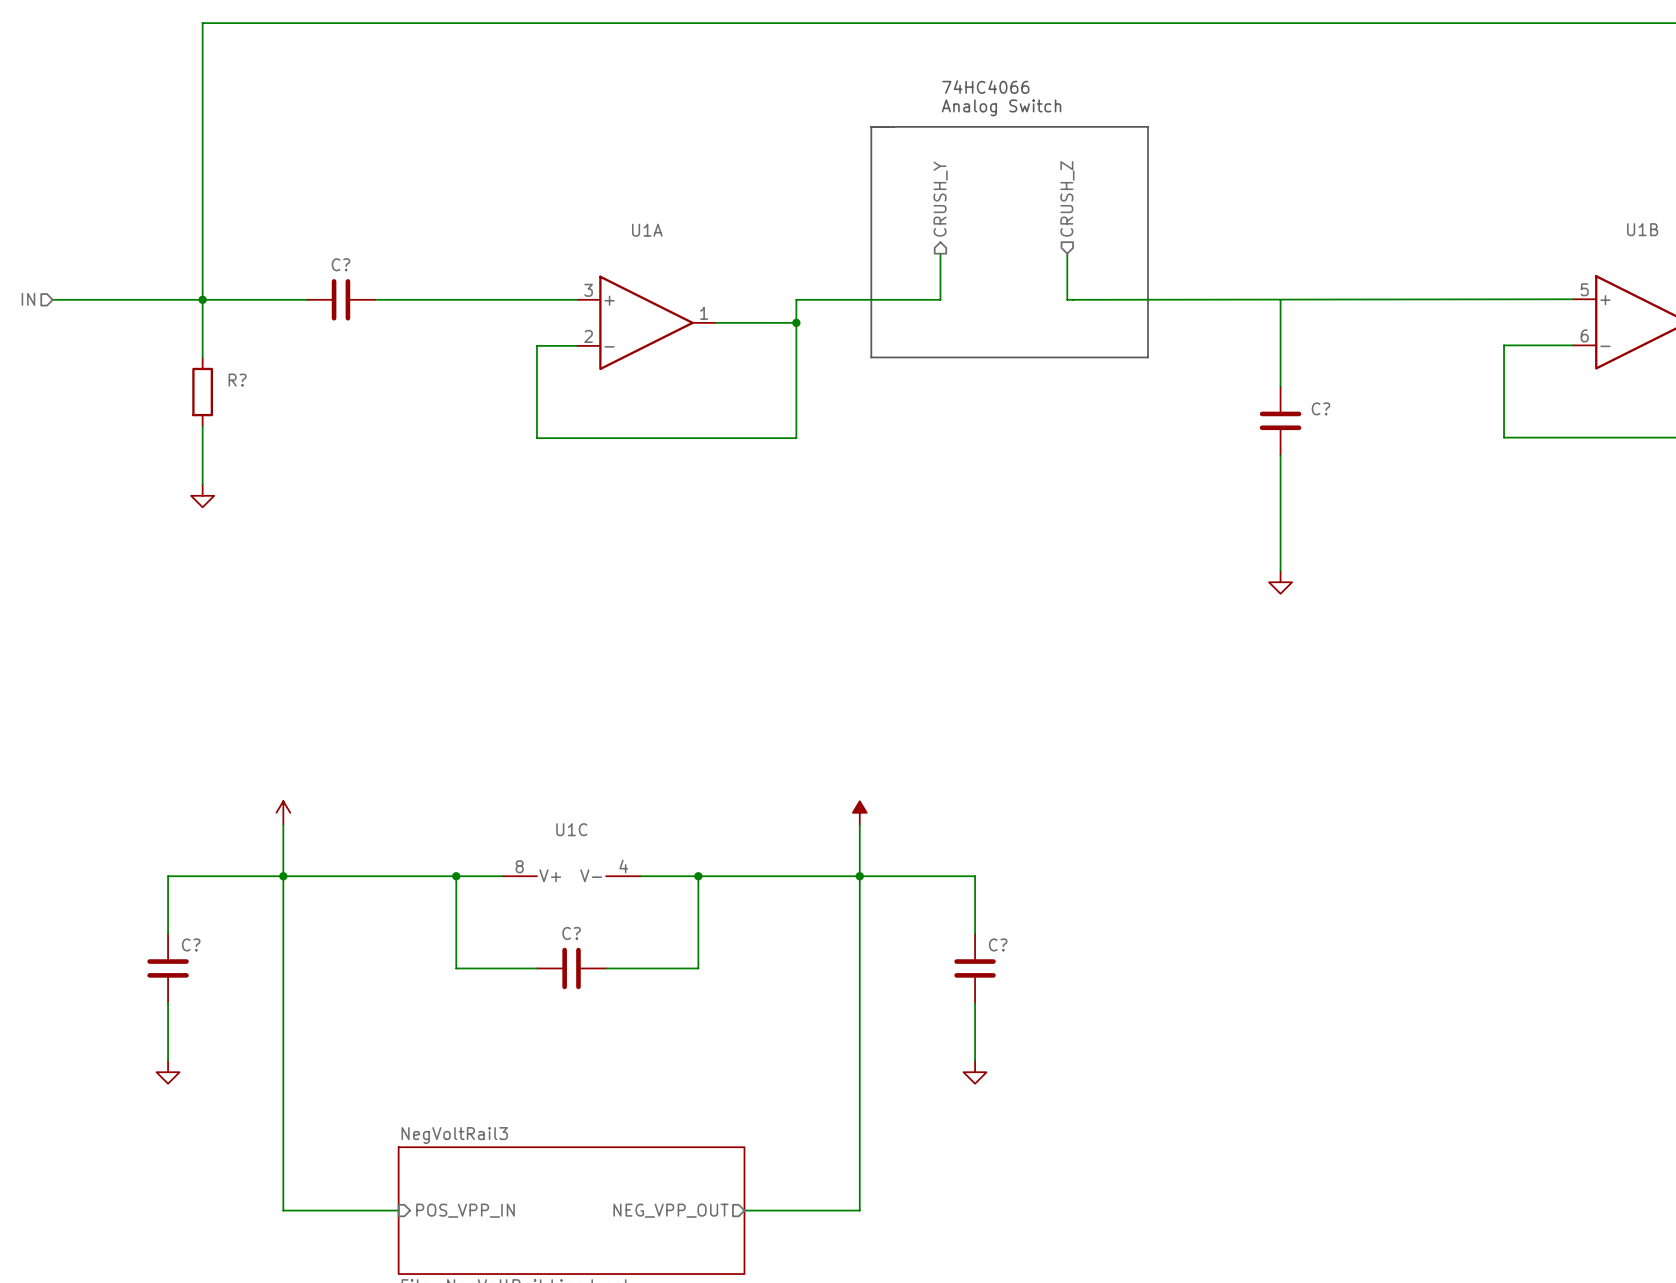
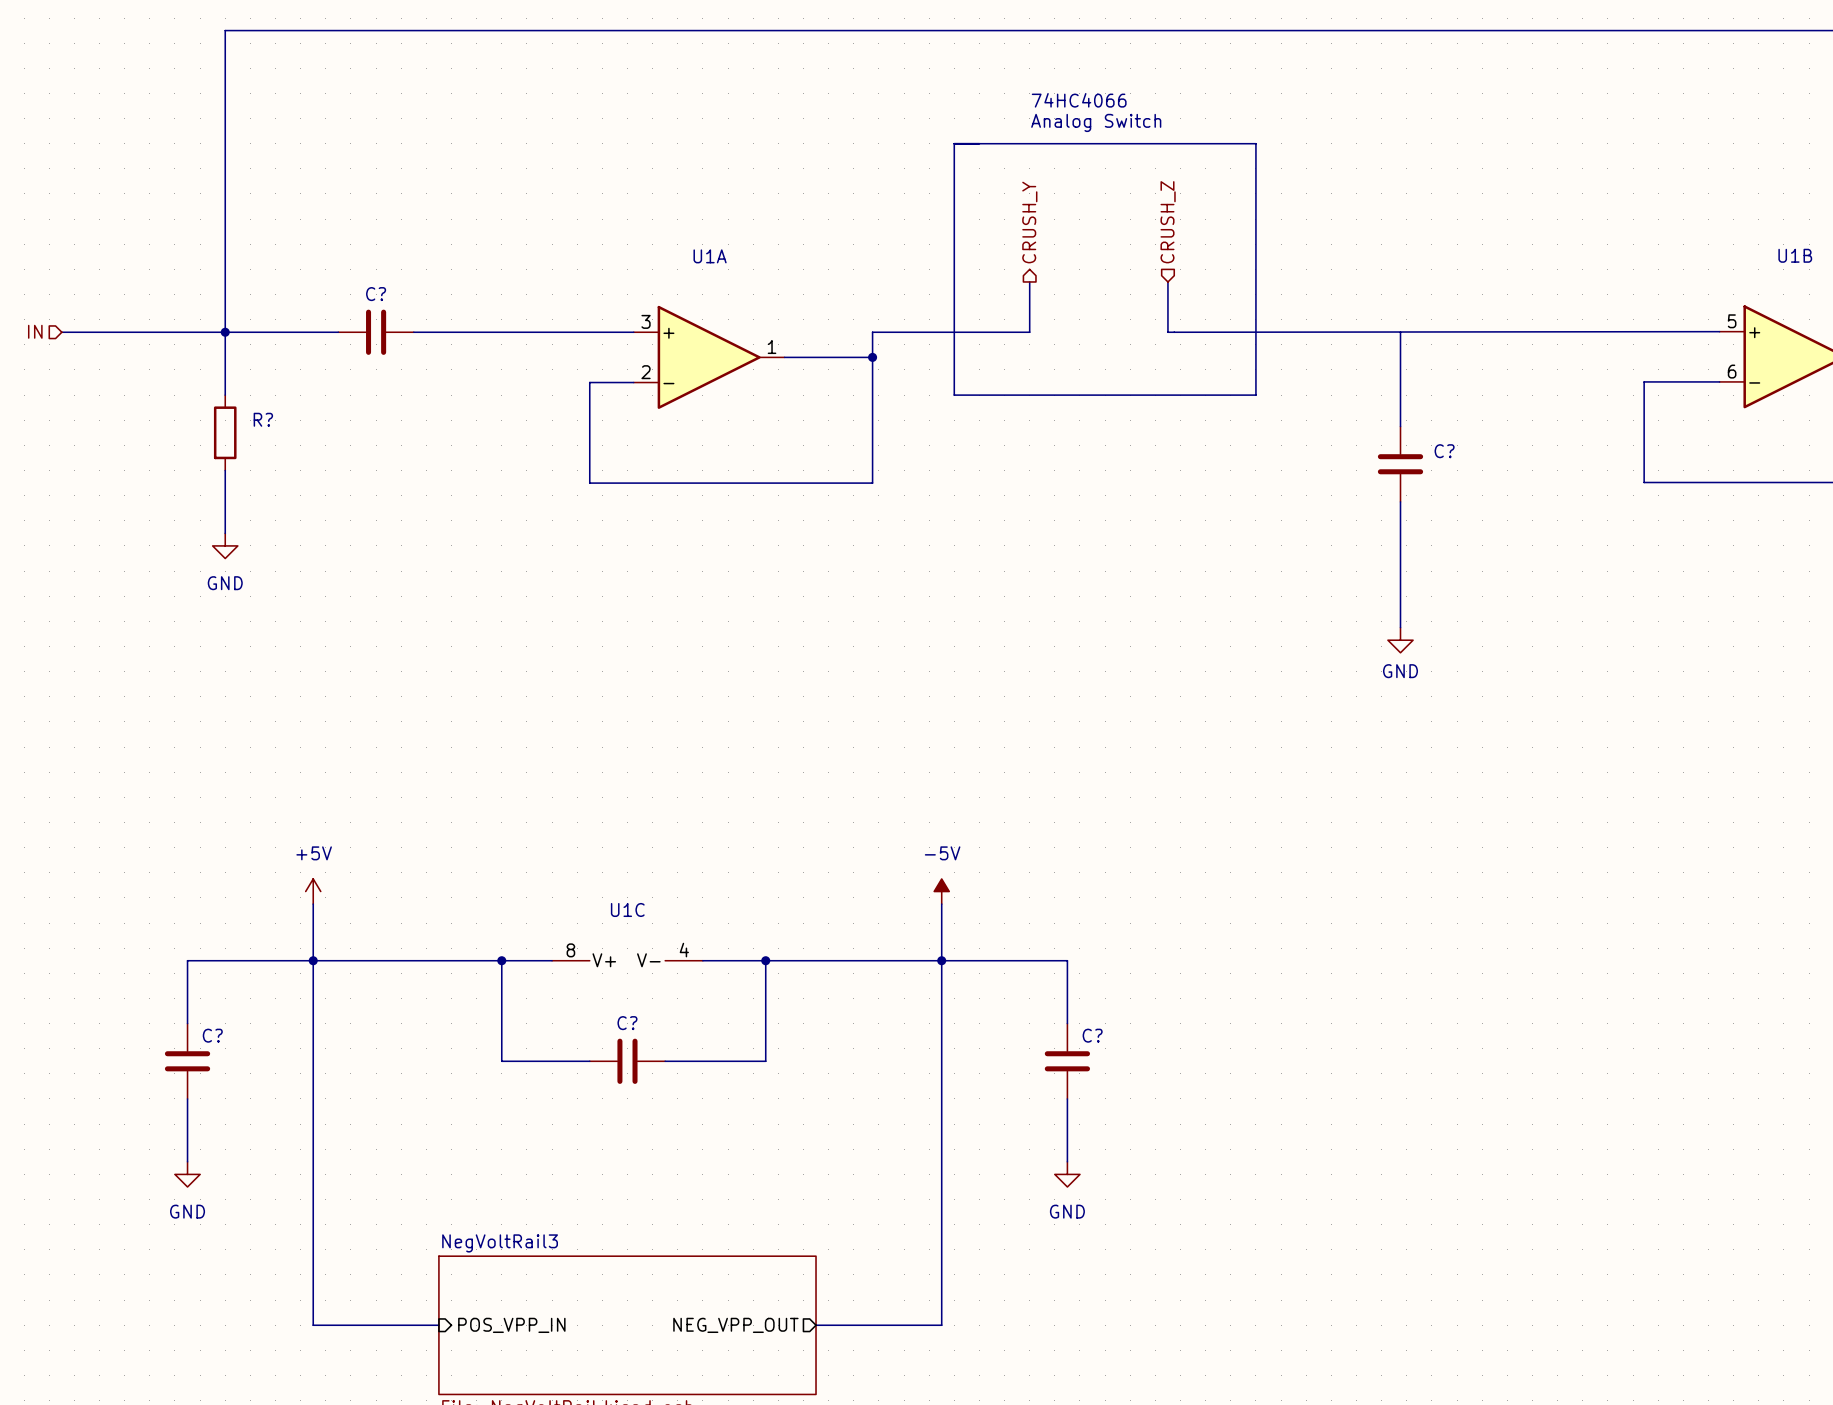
power symbol text: none -> GND (225, 583)
power symbol text: none -> GND (1400, 671)
power symbol text: none -> +5V (314, 853)
power symbol text: none -> -5V (942, 853)
power symbol text: none -> GND (187, 1211)
power symbol text: none -> GND (1067, 1211)

